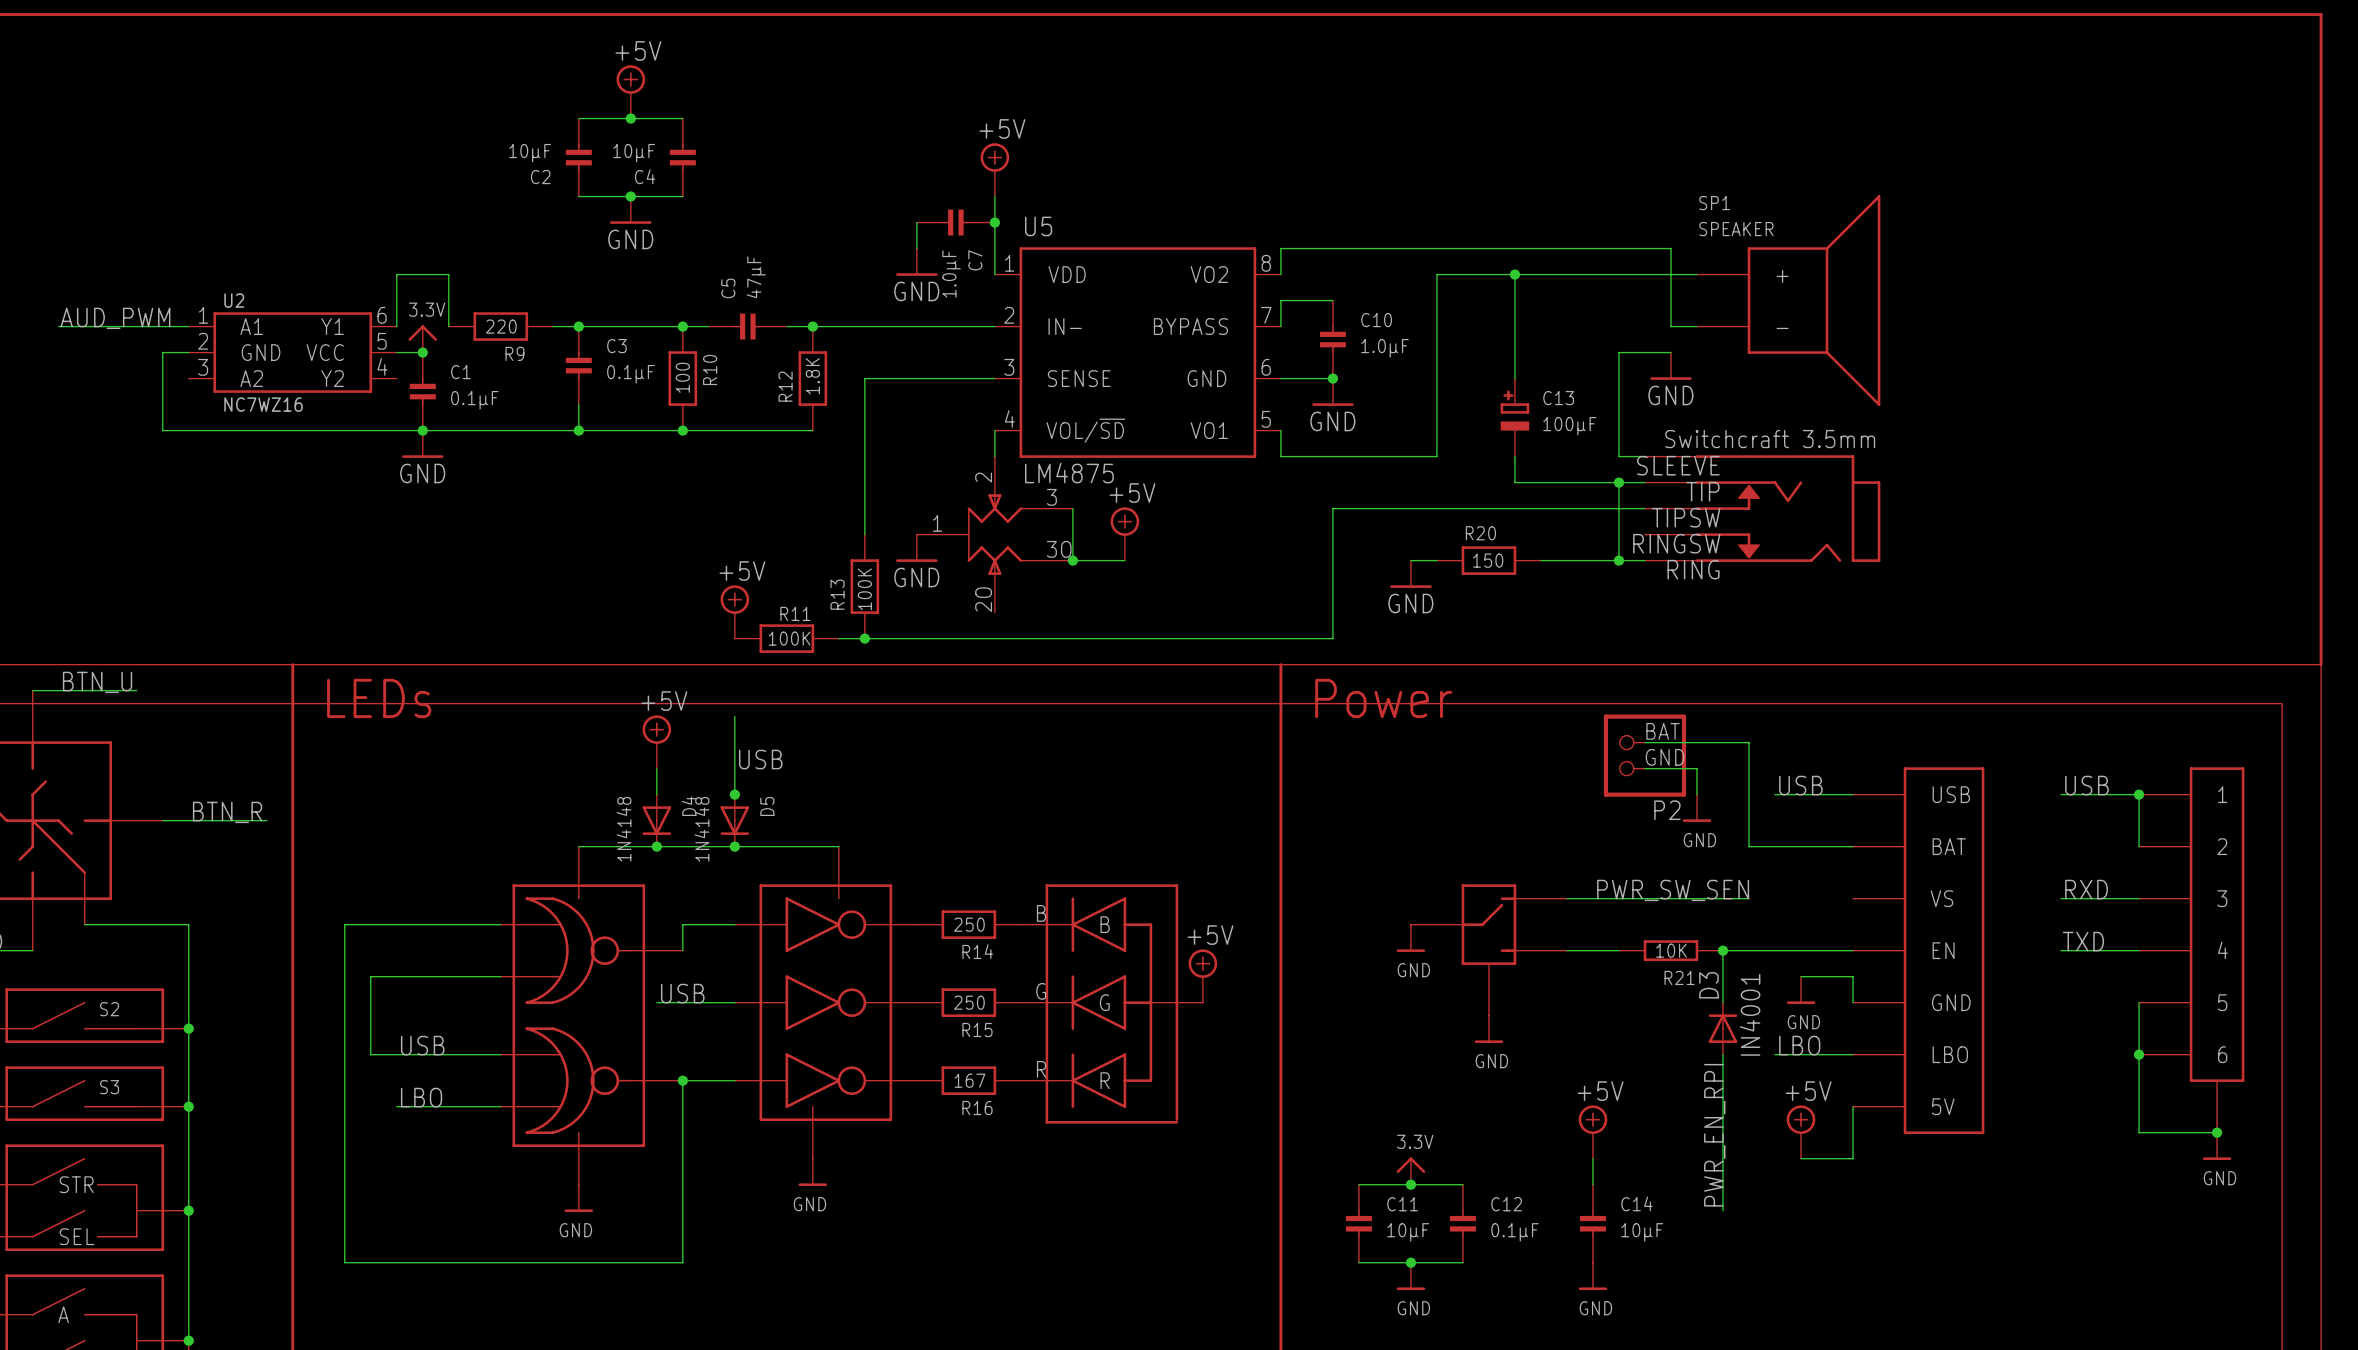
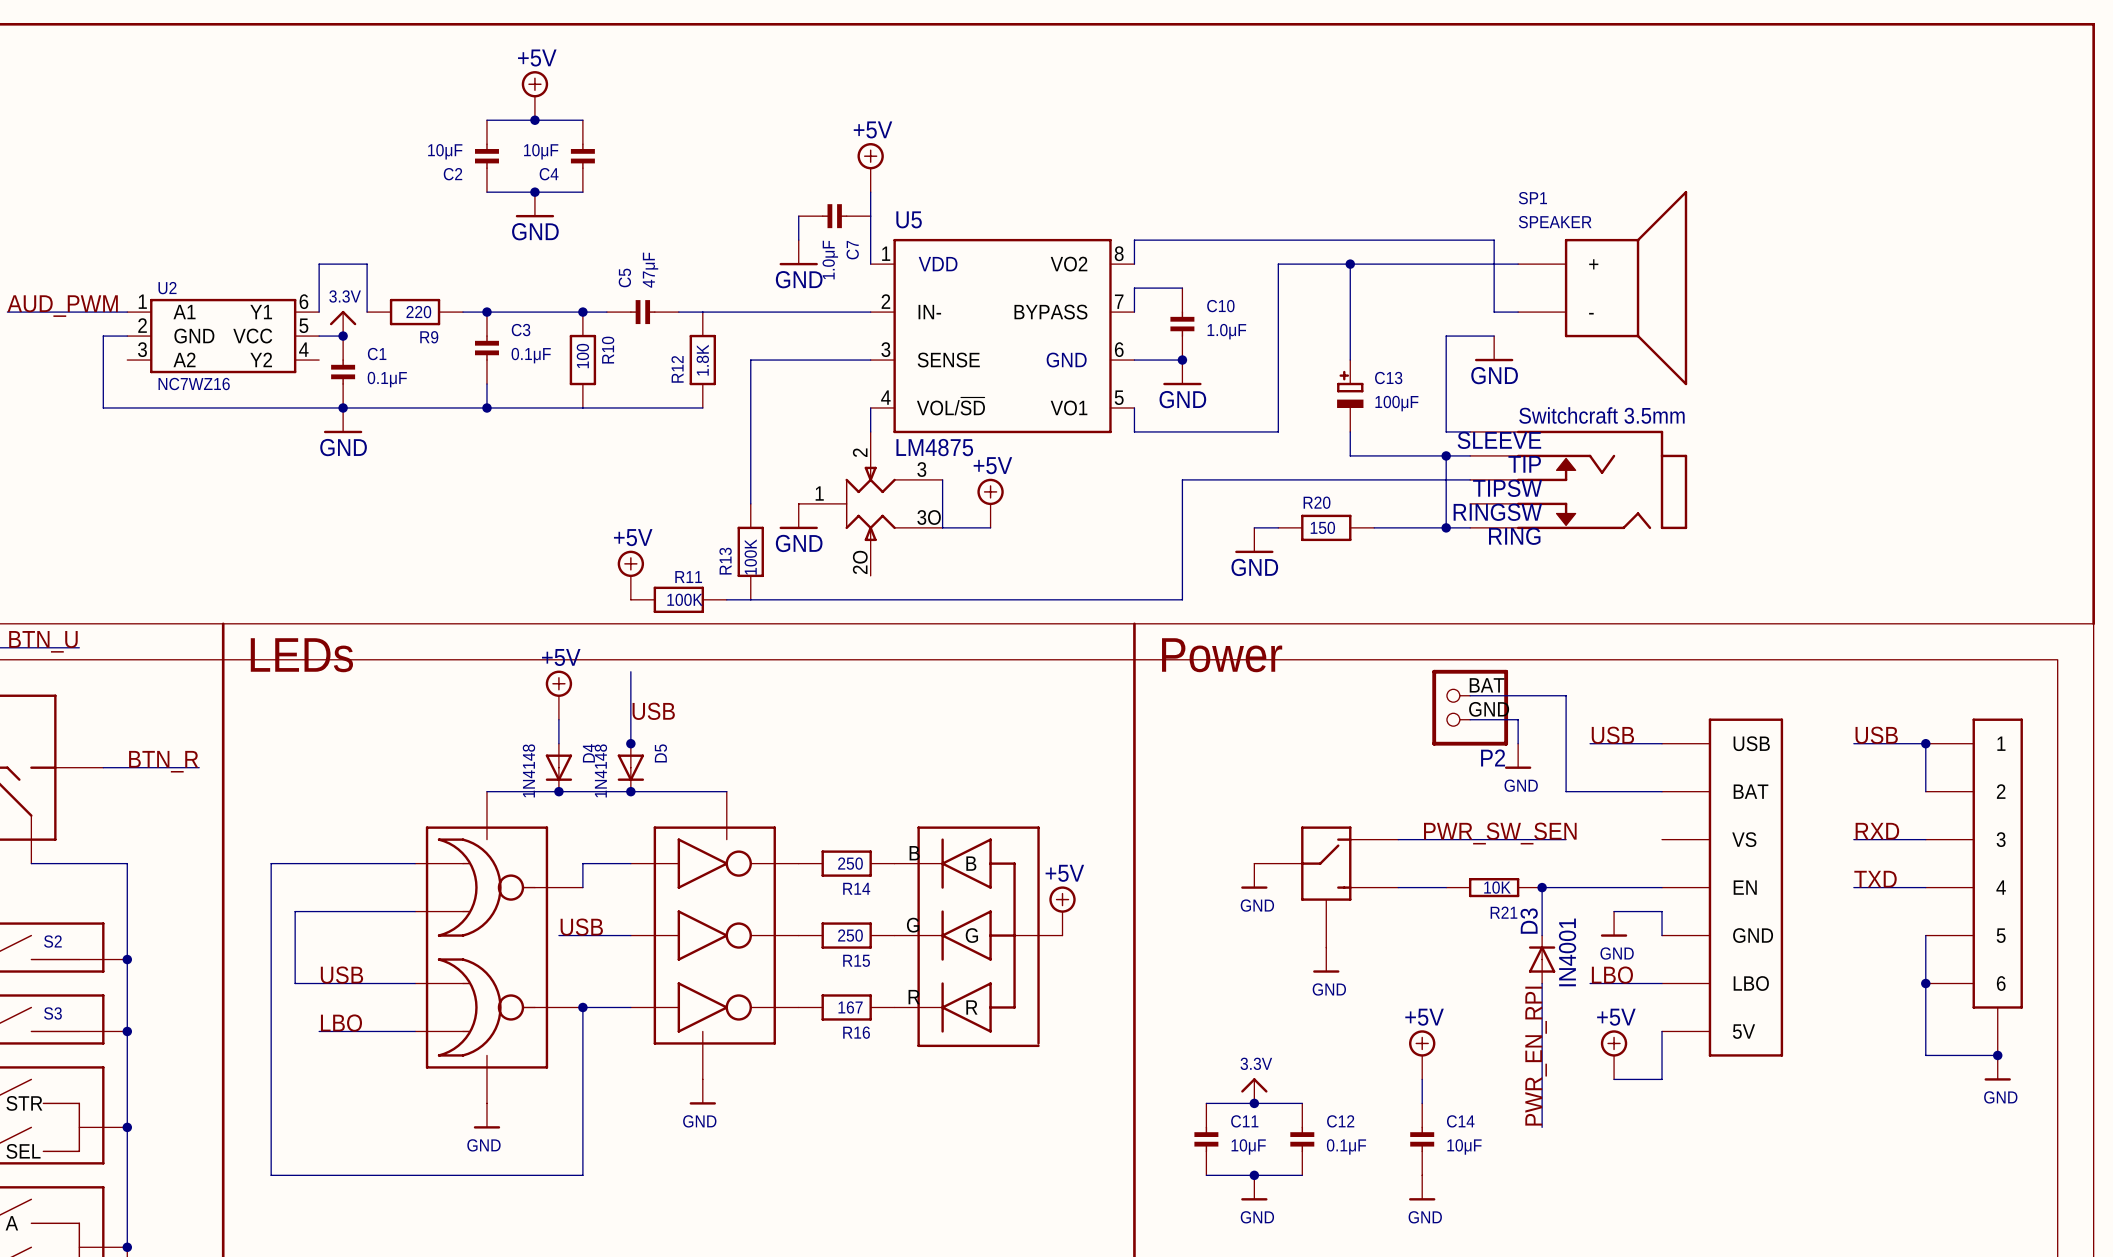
junction: (994, 222) -> none
junction: (812, 326) -> none
junction: (682, 430) -> none
junction: (1072, 560) -> none
junction: (864, 638) -> none

